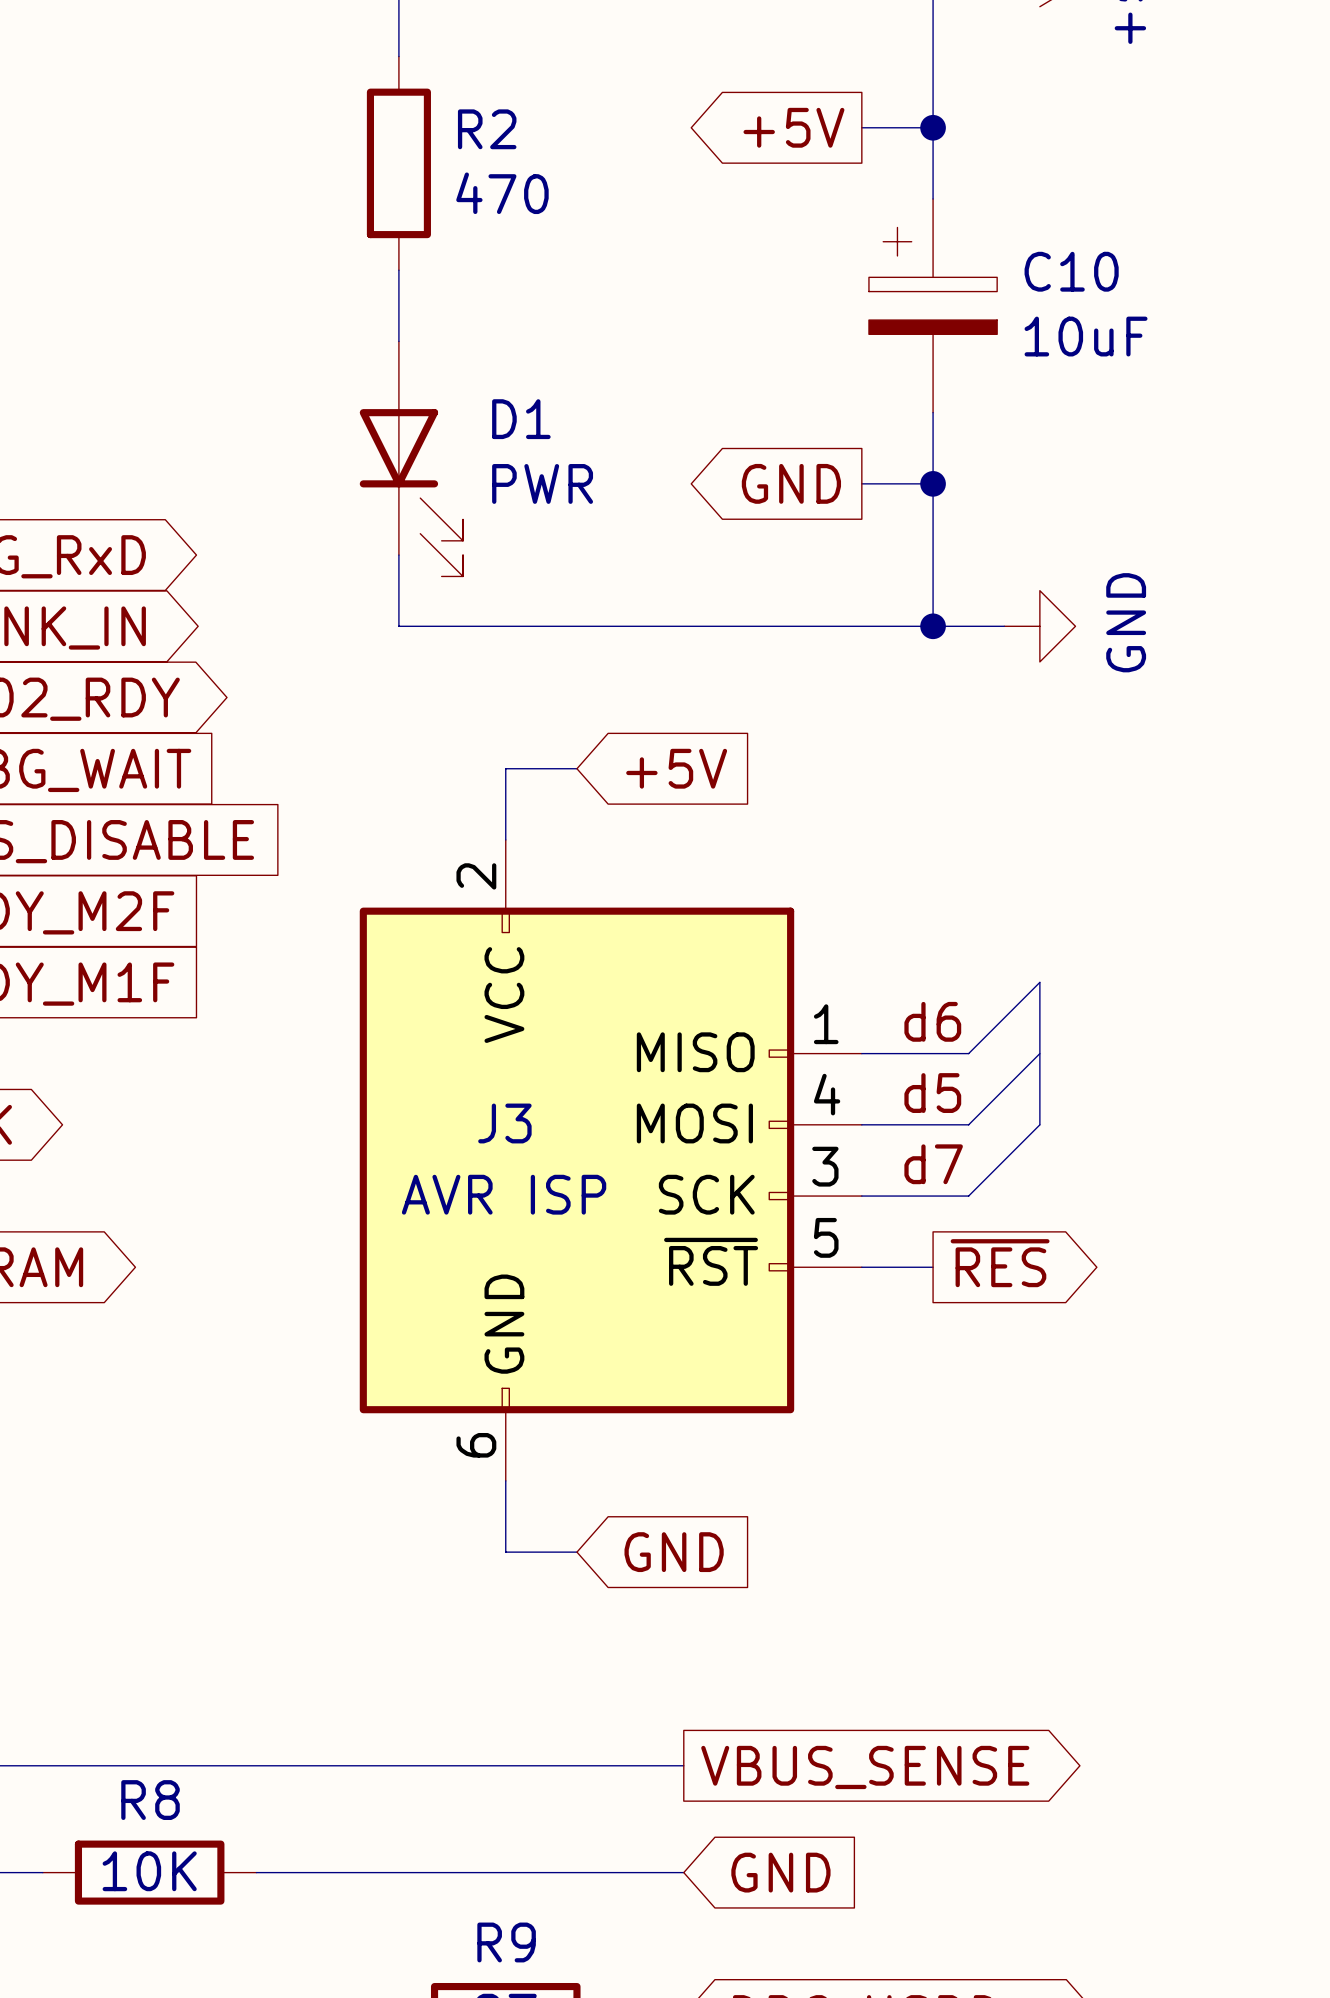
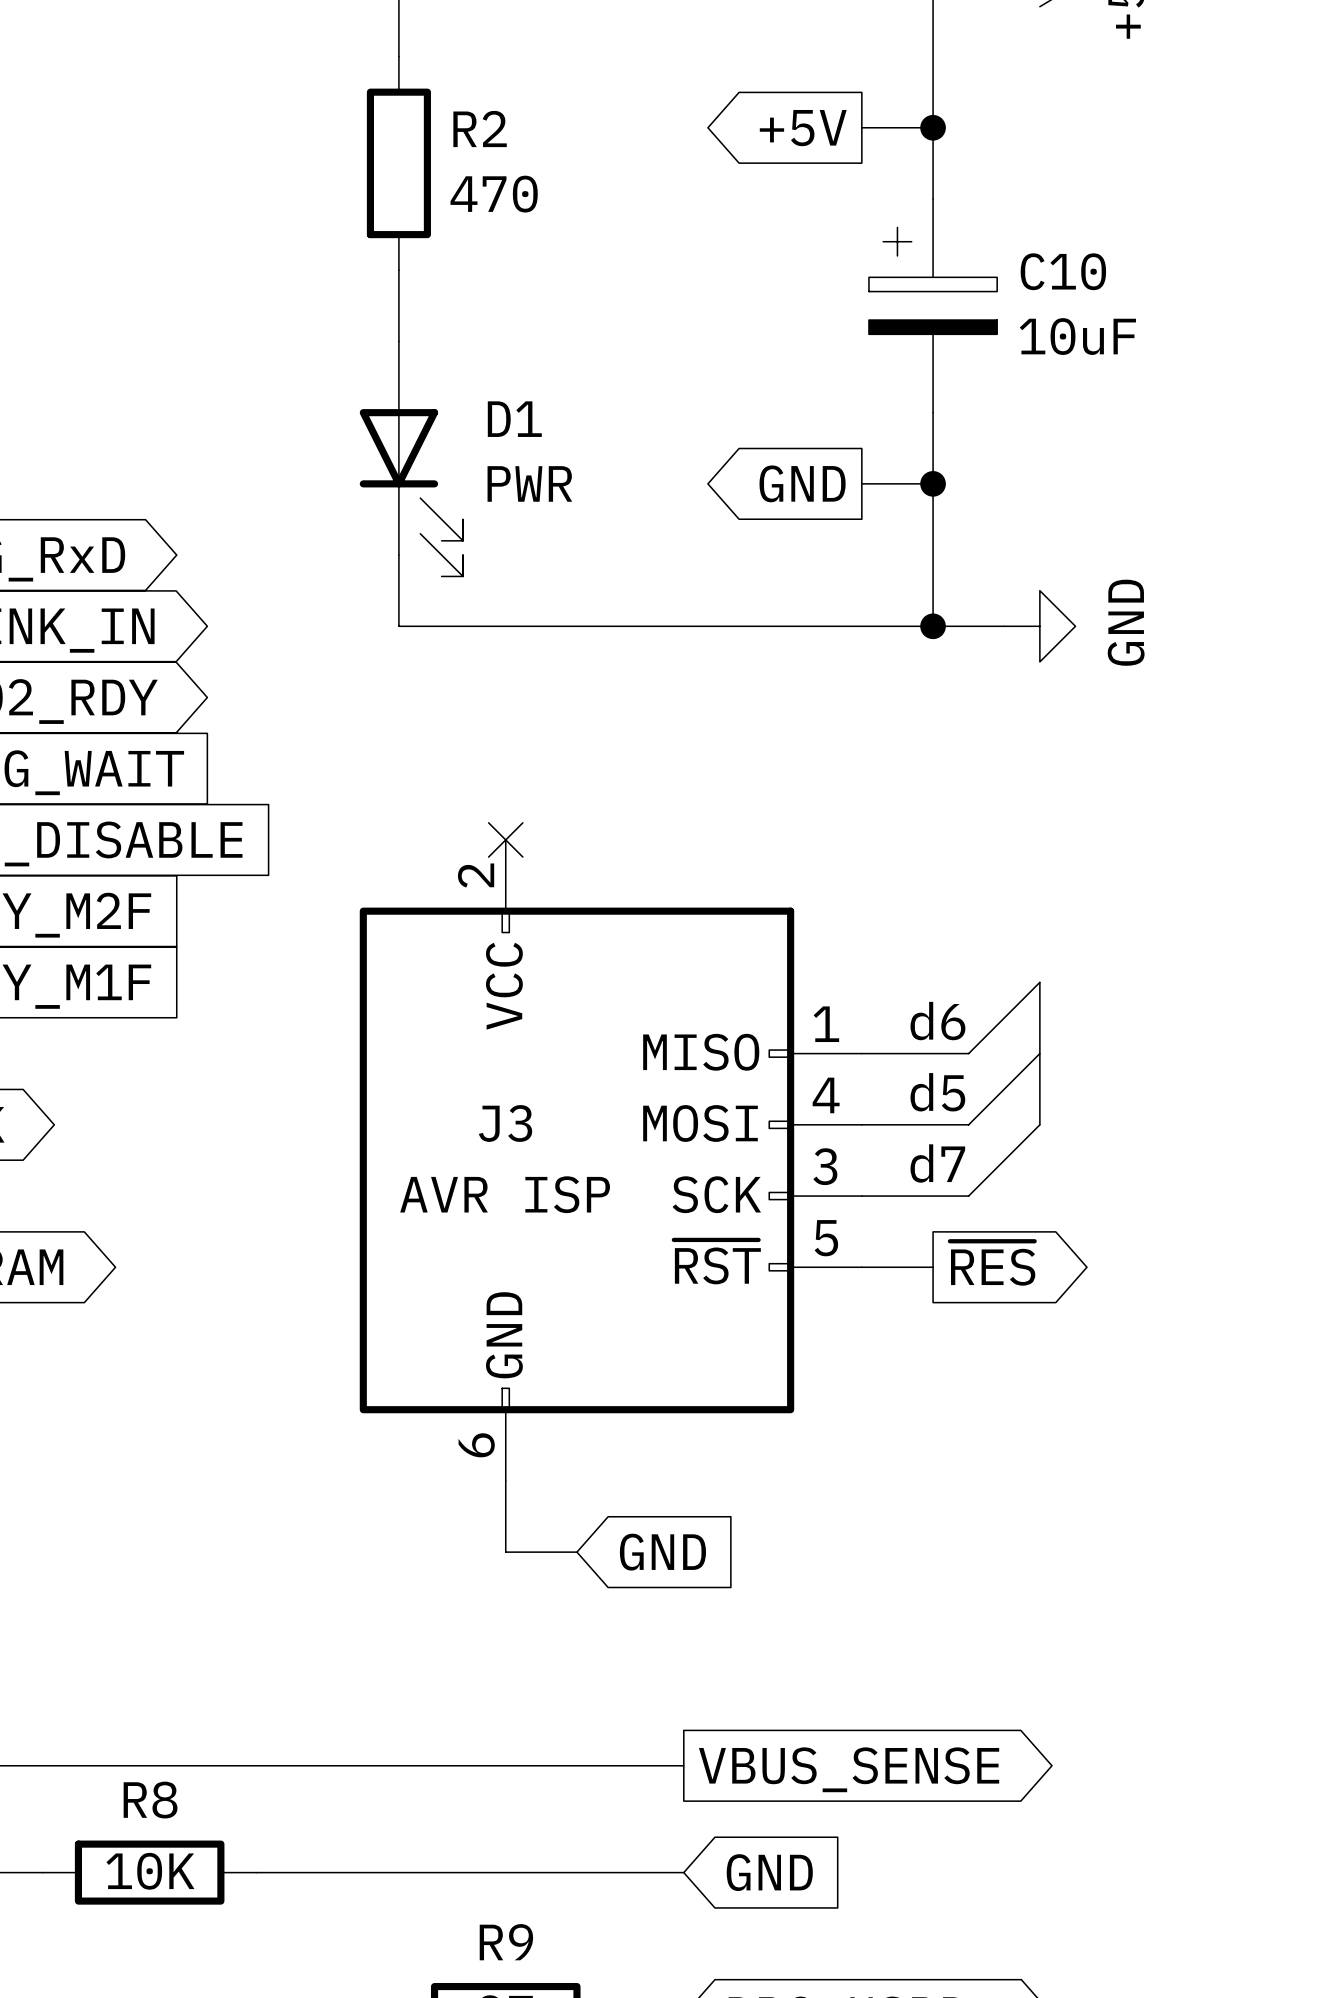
wire: (576, 768) (505, 768) (505, 839) -> none
global label: +5V (676, 768) -> none
no-connect mark: none -> (505, 839)

